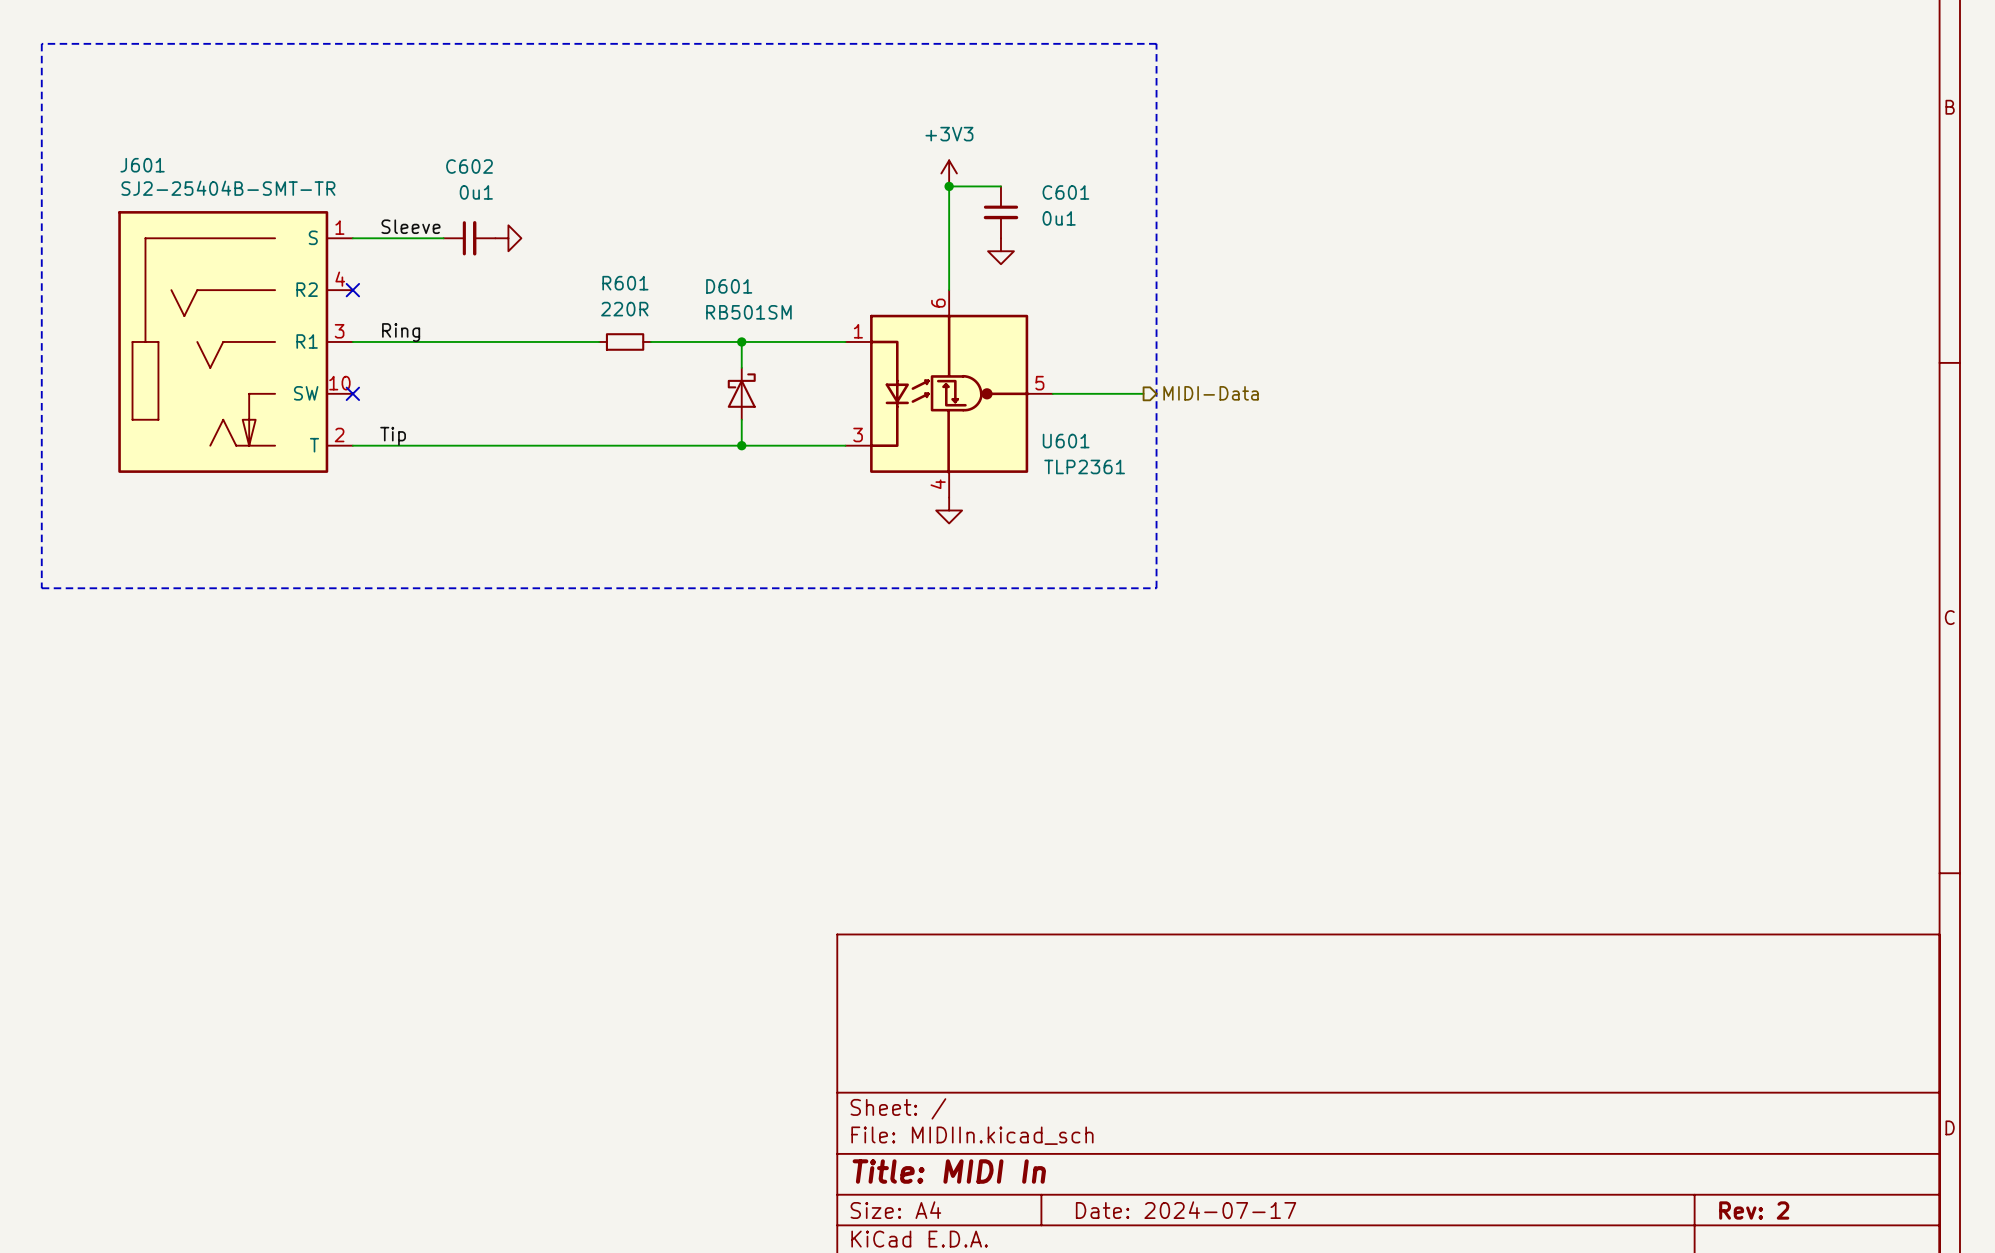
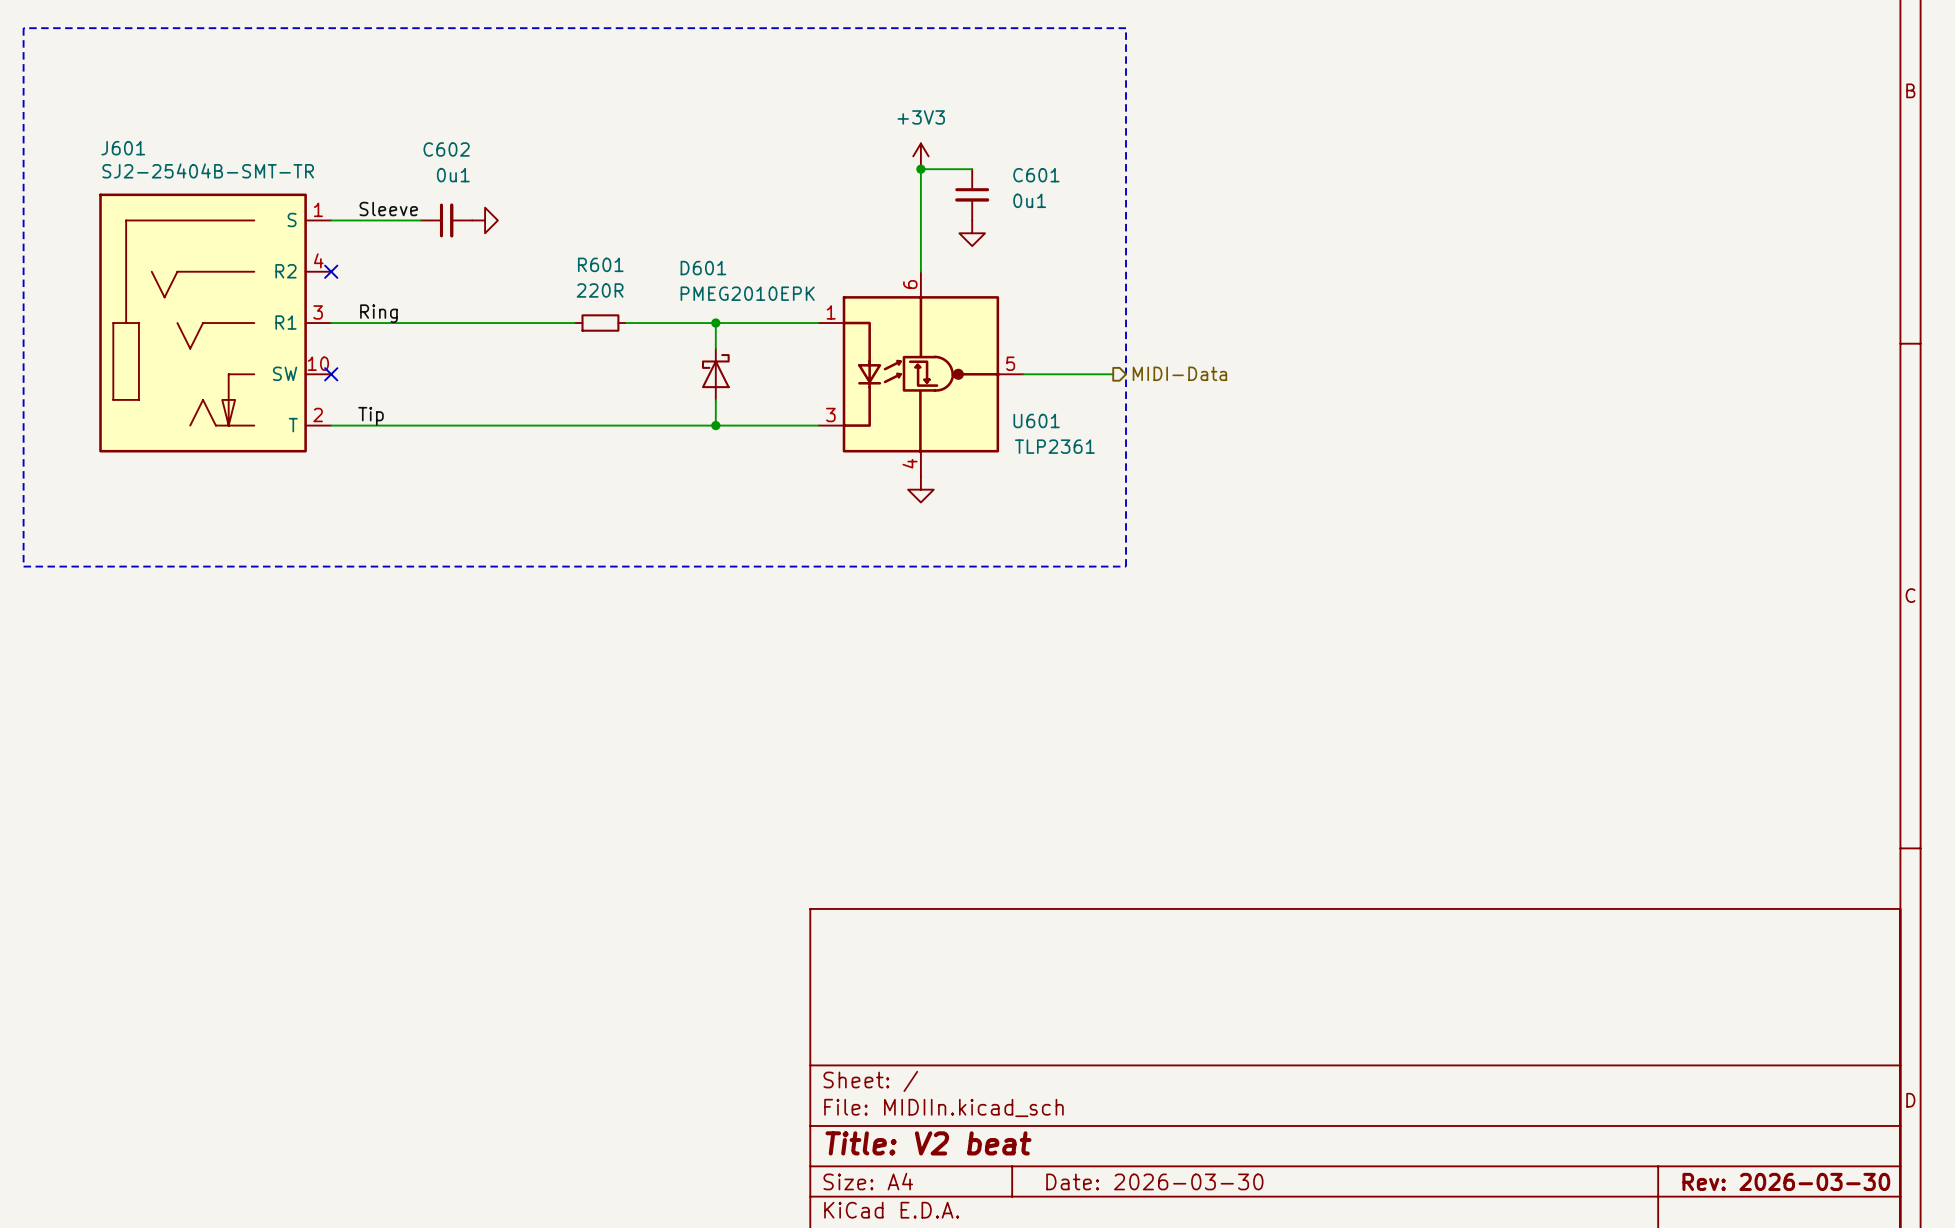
D601 value: RB501SM (748, 312) -> PMEG2010EPK (747, 293)
title block: Title: MIDI In (949, 1171) -> Title: V2 beat (928, 1143)
title block: Date: 2024-07-17 (1186, 1210) -> Date: 2026-03-30 (1154, 1181)
title block: Rev: 2 (1754, 1210) -> Rev: 2026-03-30 (1786, 1181)

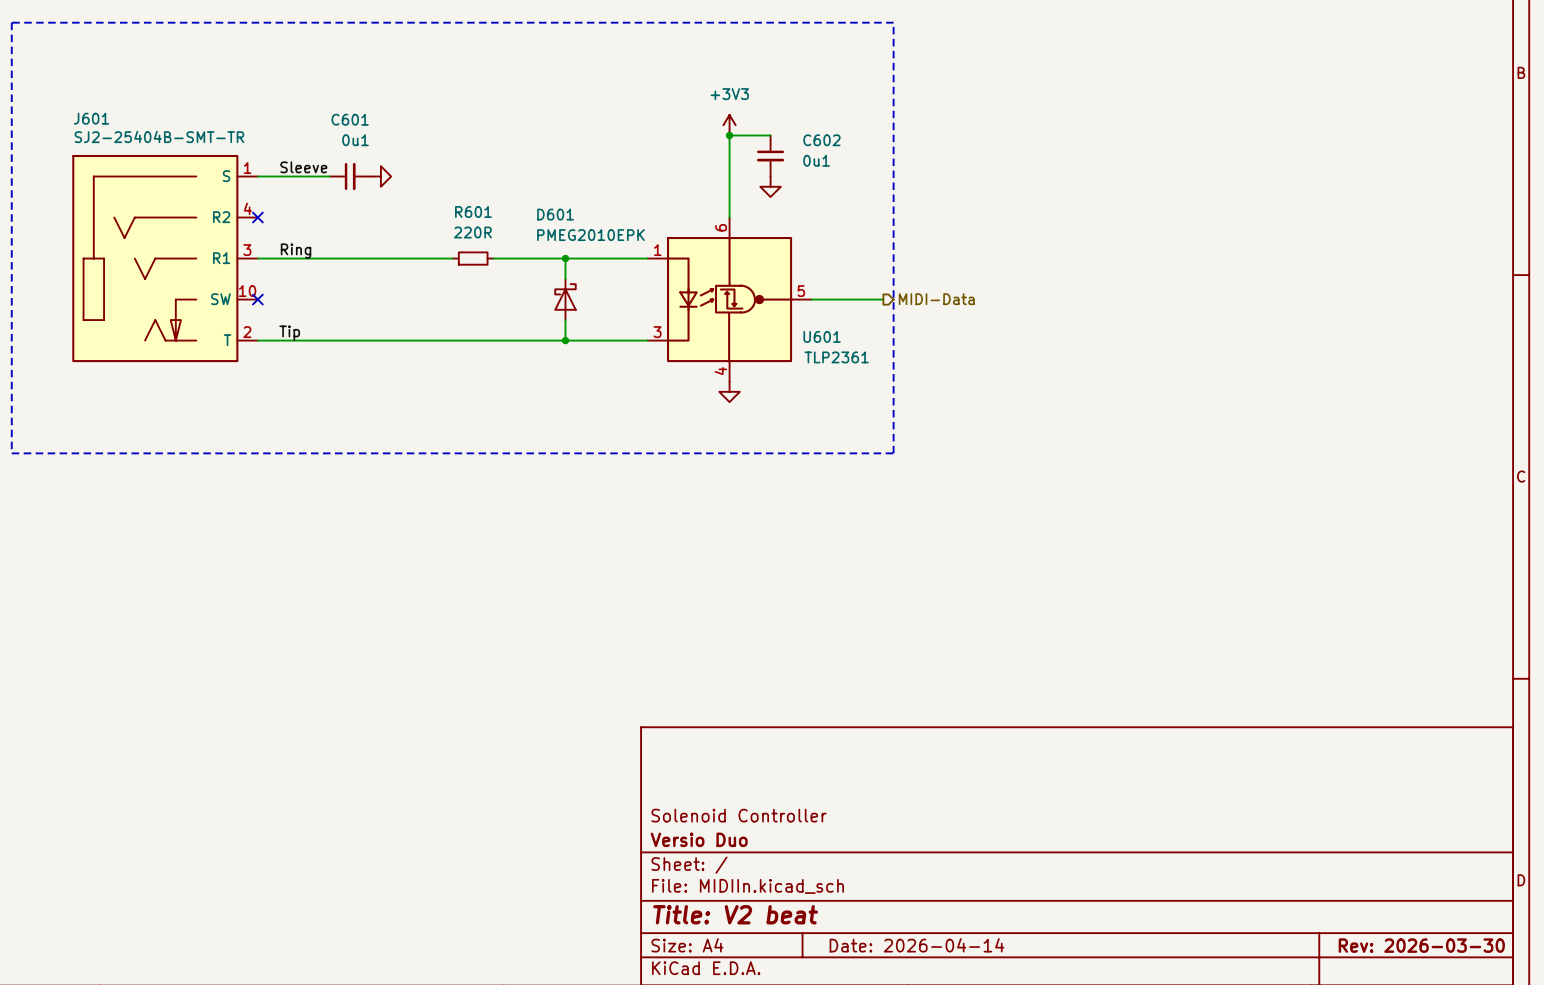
C602 name: C602 (446, 149) -> C601 (350, 119)
C601 name: C601 (1036, 175) -> C602 (821, 140)
title block: none -> Solenoid Controller (739, 815)
title block: none -> Versio Duo (699, 839)
title block: Date: 2026-03-30 (1154, 1181) -> Date: 2026-04-14 (916, 945)

